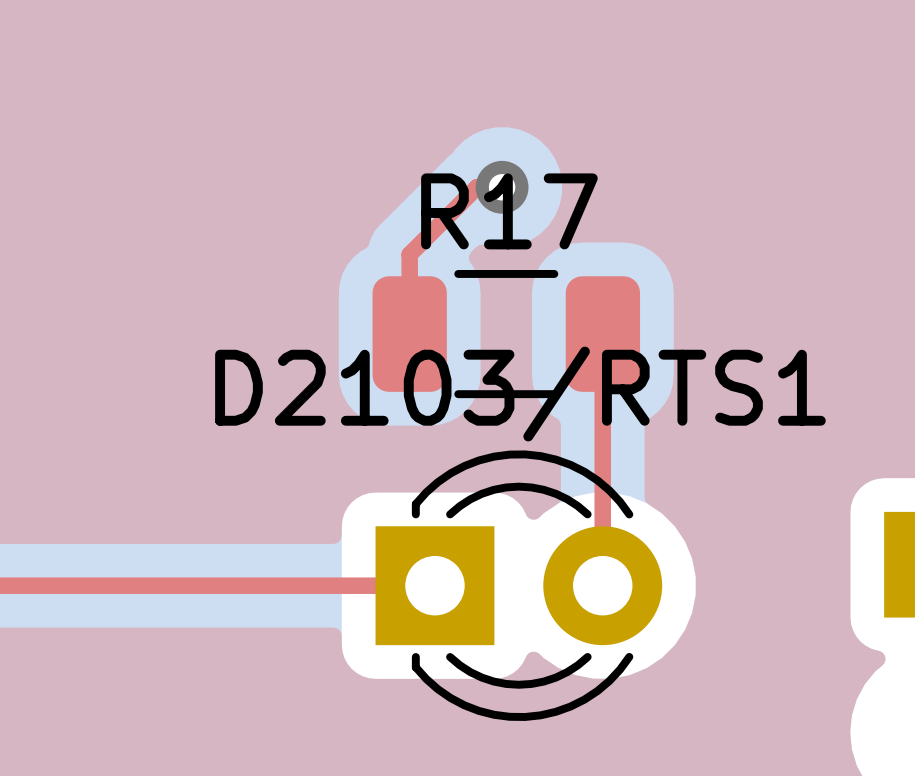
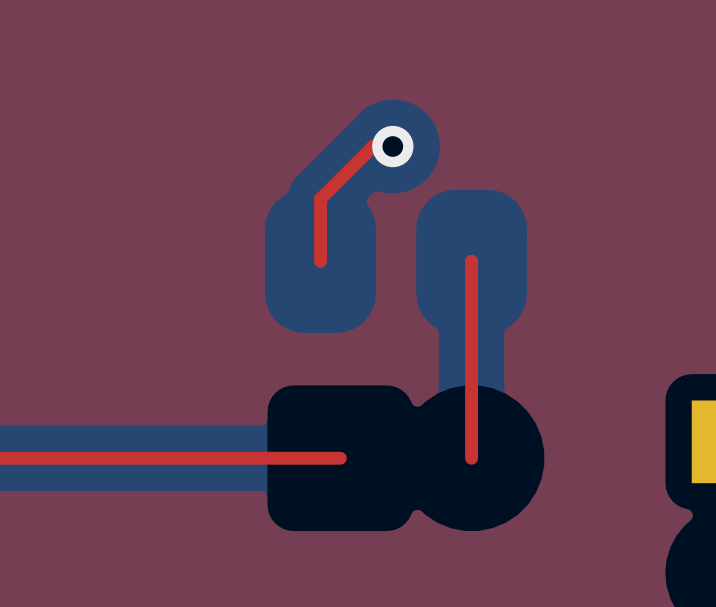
R17: (506, 334) -> none
D2103/RTS1: (518, 585) -> none

